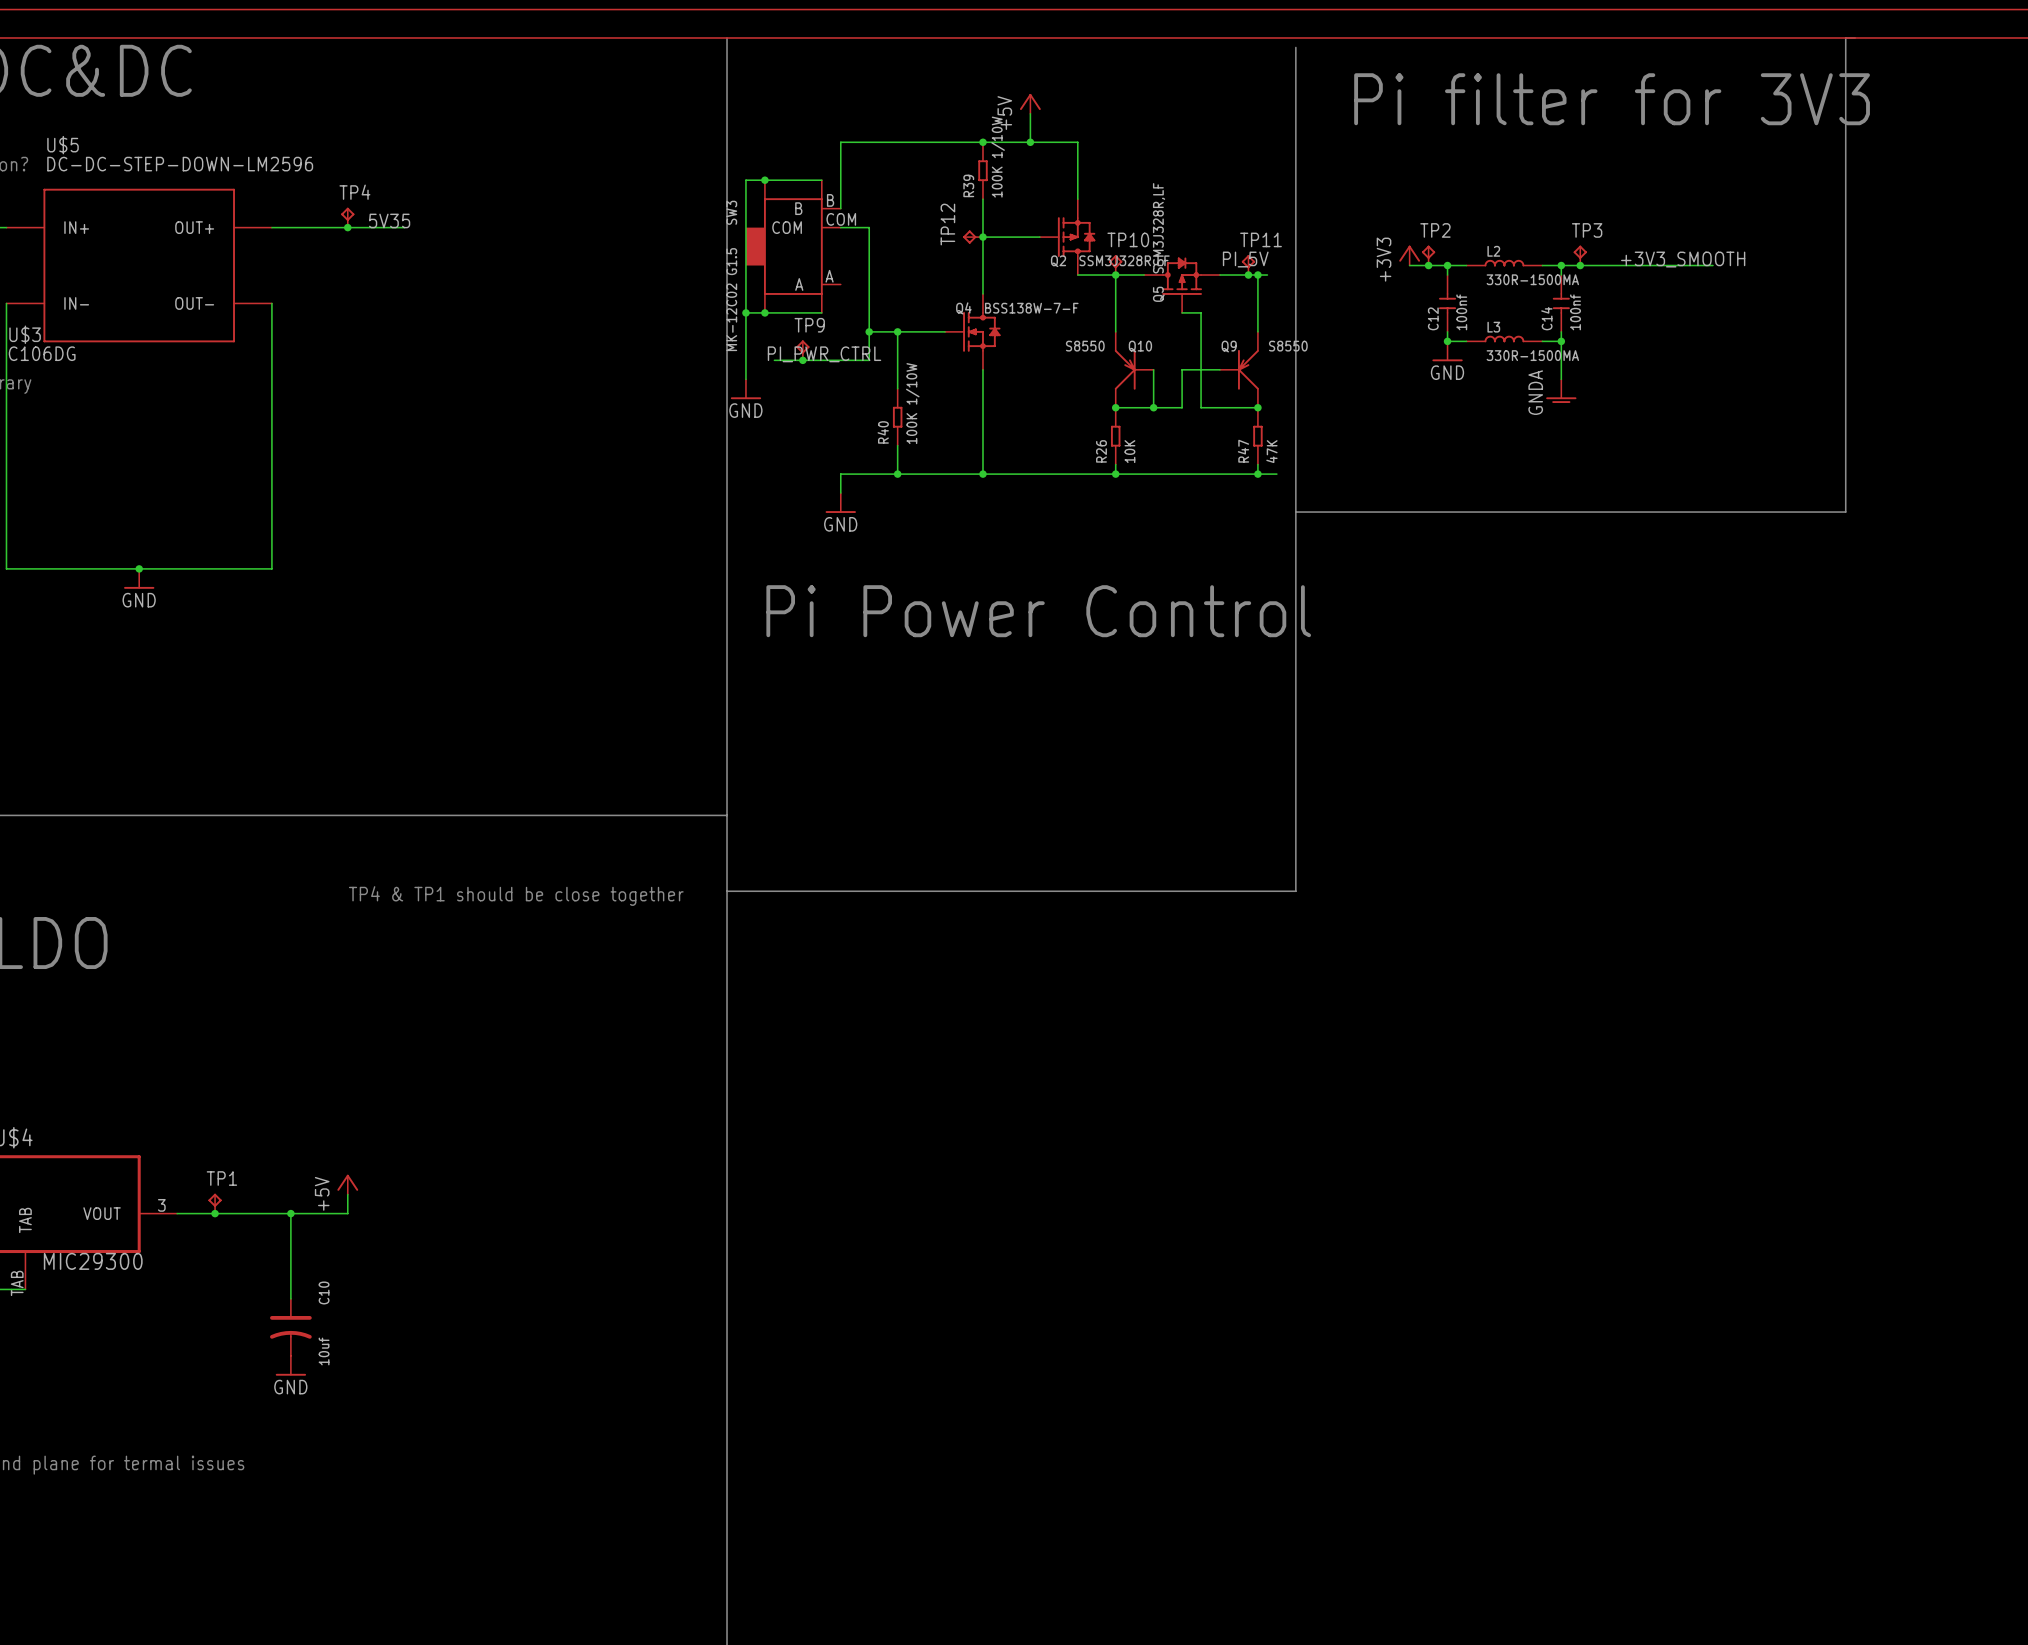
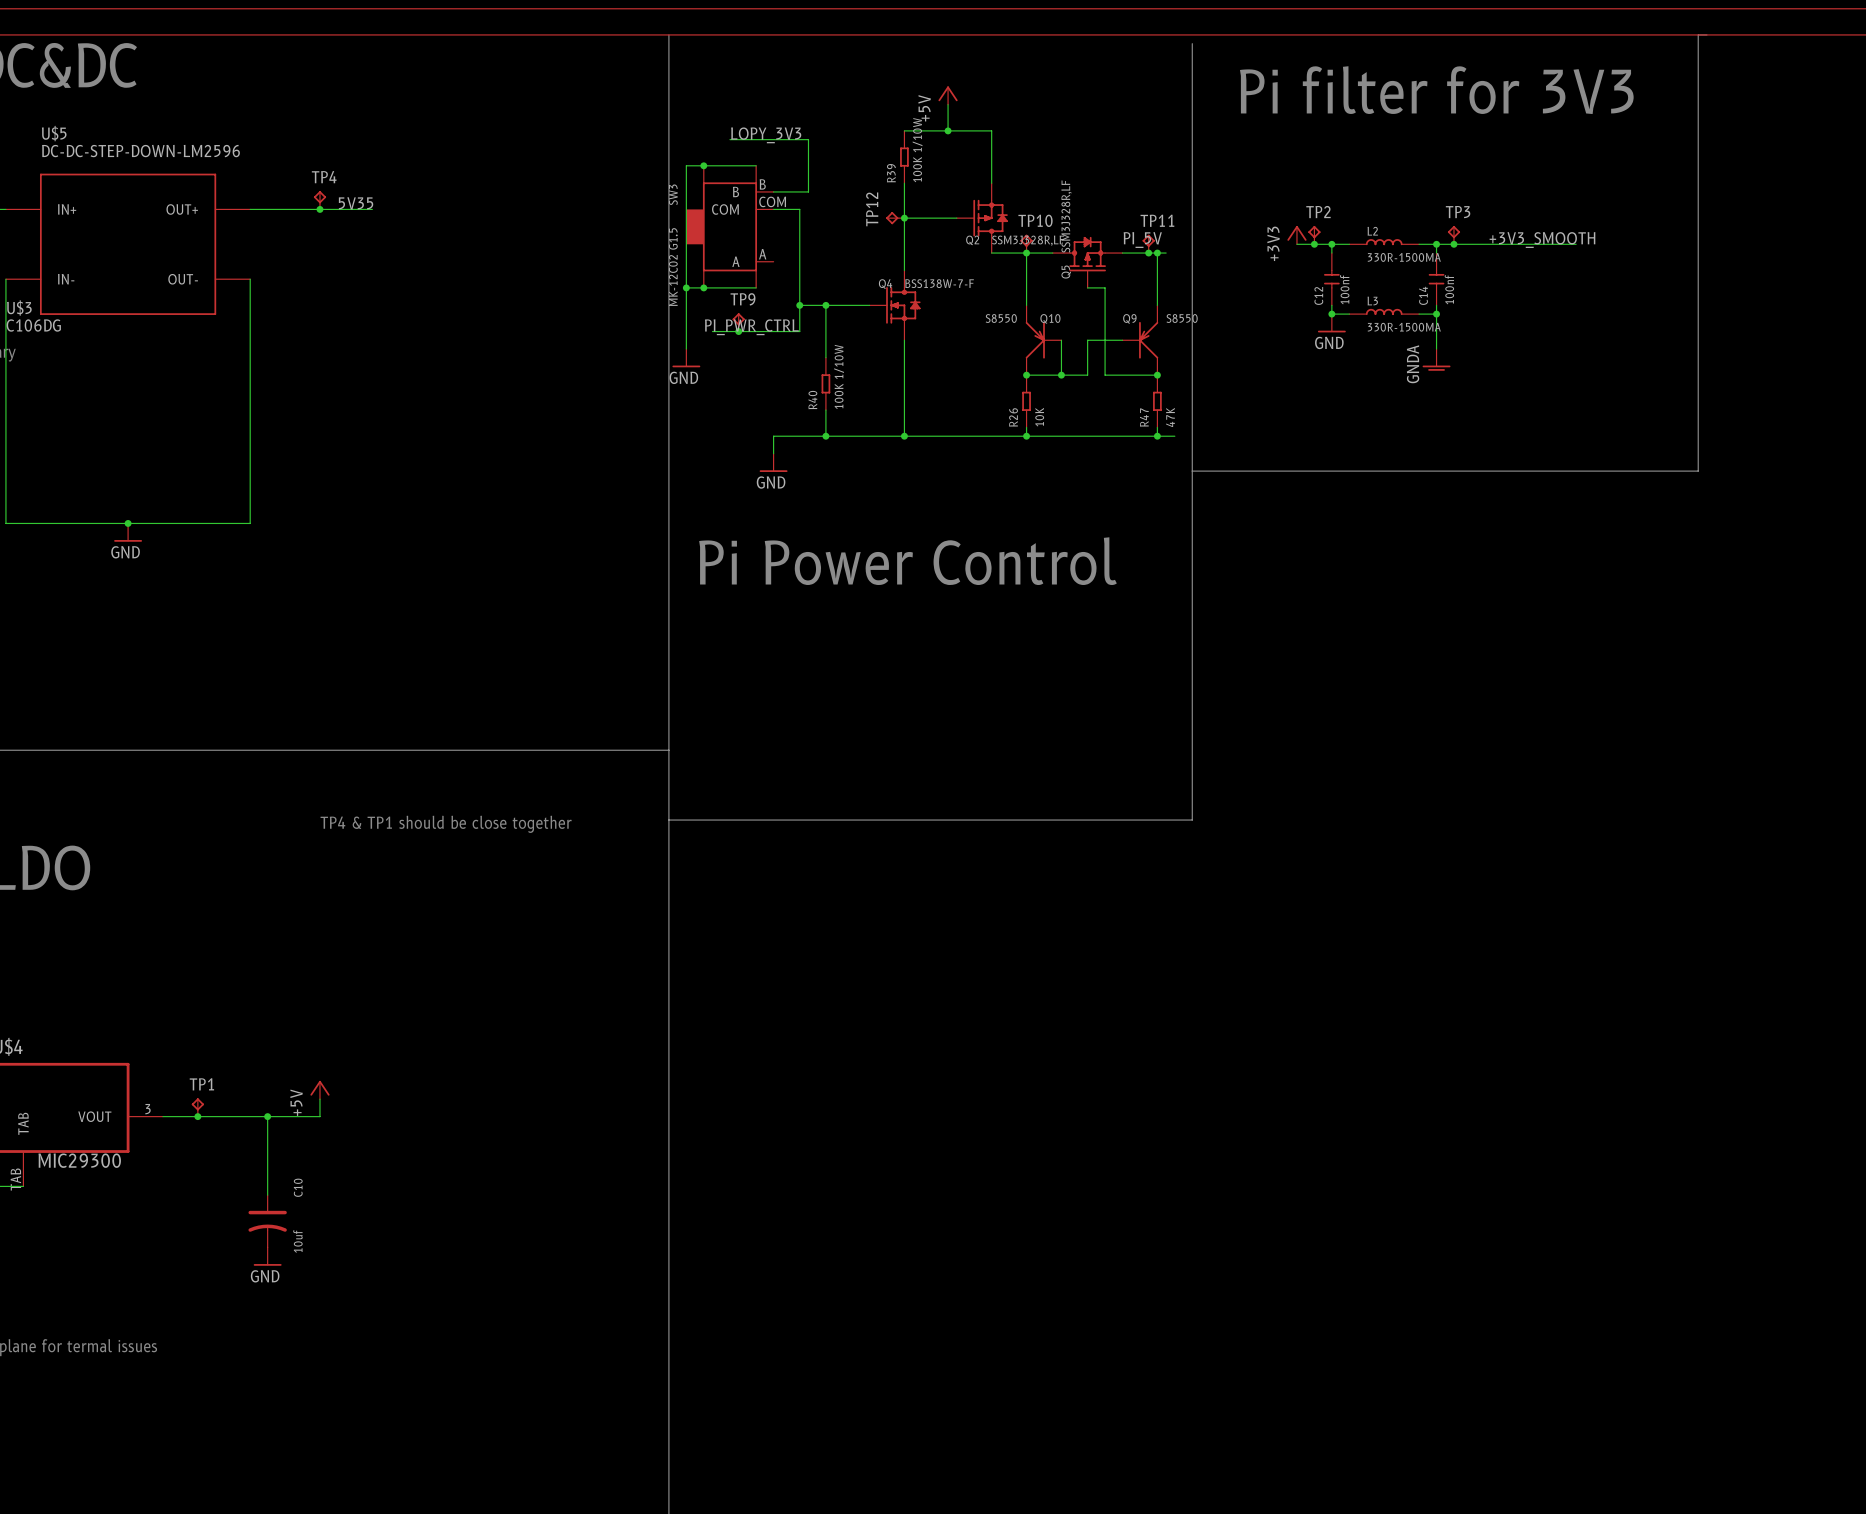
wire: (982, 142) (840, 142) (840, 208) -> (729, 139) (808, 139) (808, 191) (773, 191)
junction: (982, 142) -> none
label: none -> LOPY_3V3 (766, 135)

